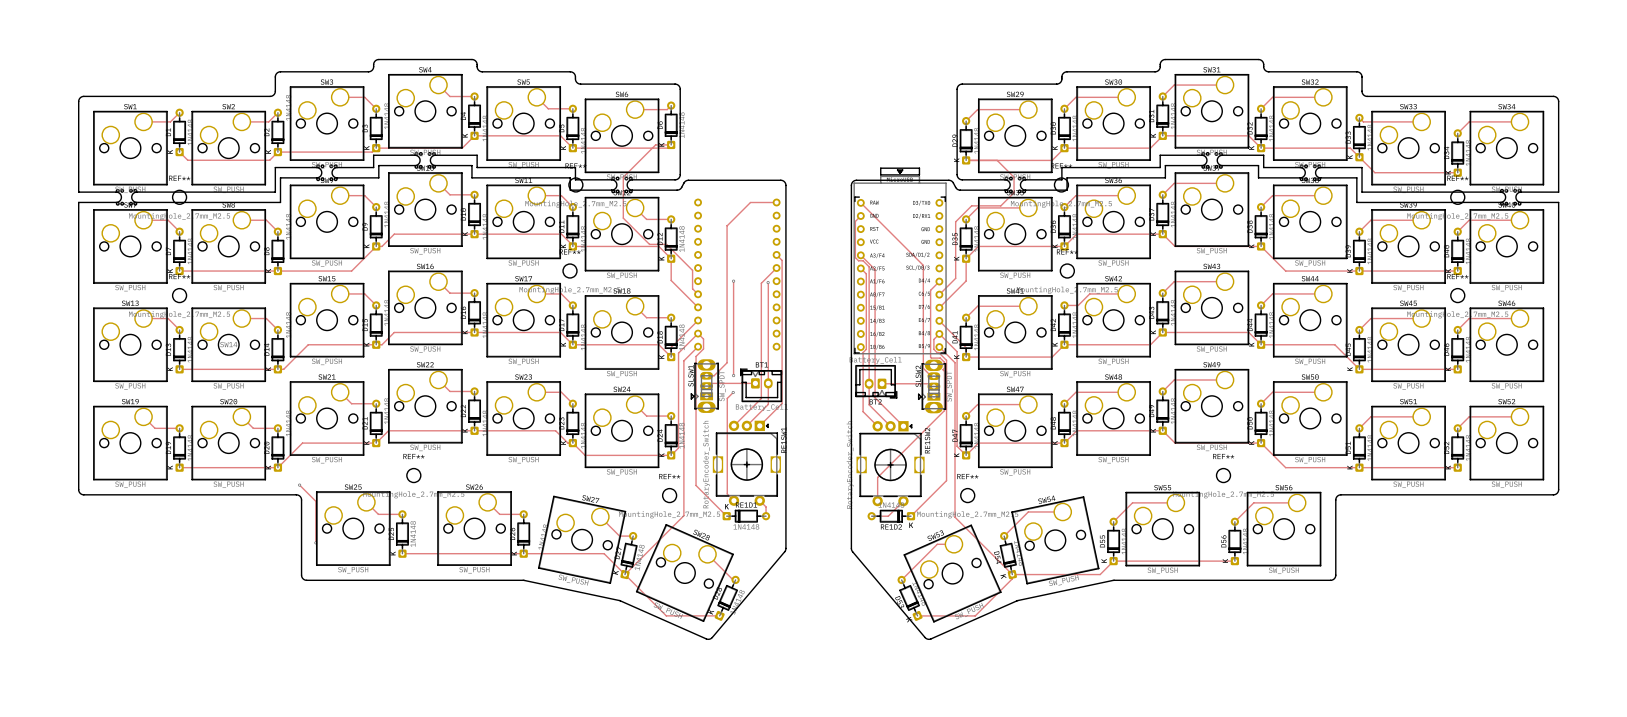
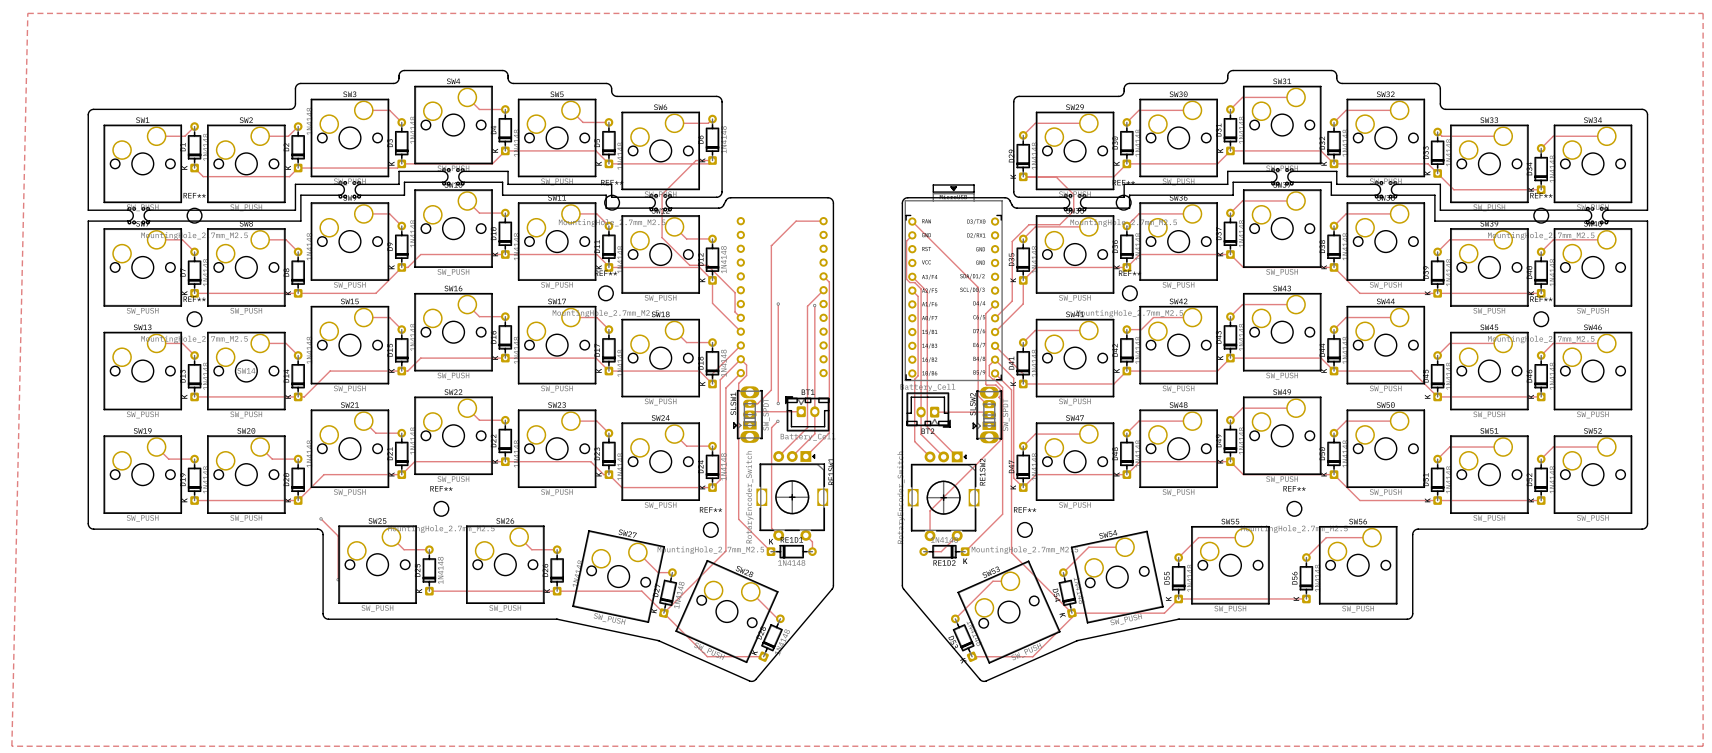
zone outline: none -> (27, 13) (1703, 13) (1703, 746) (11, 746) (27, 13)

